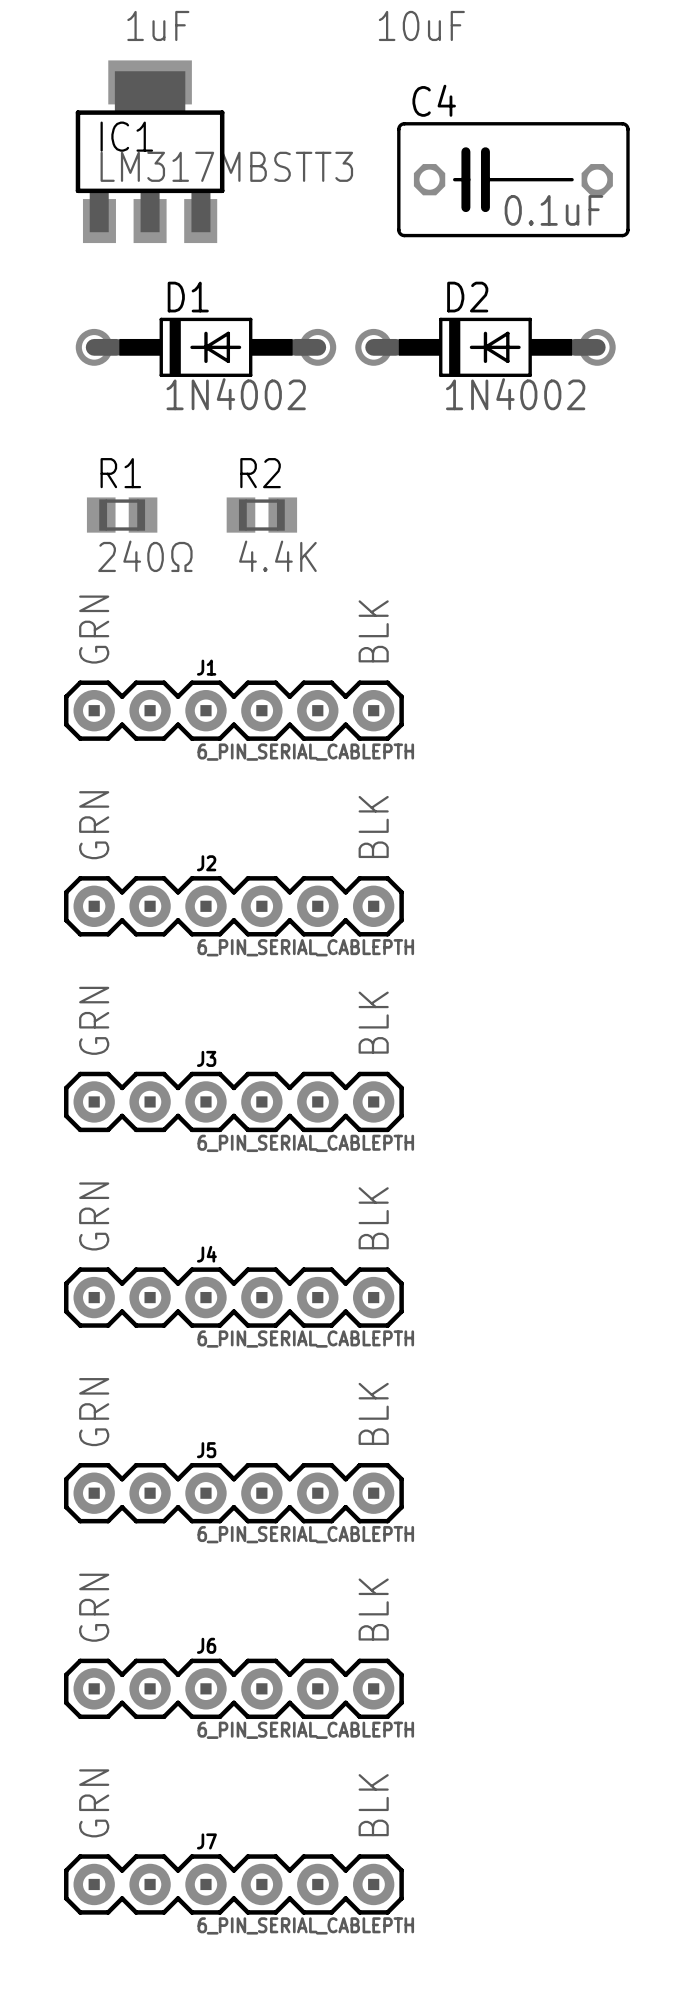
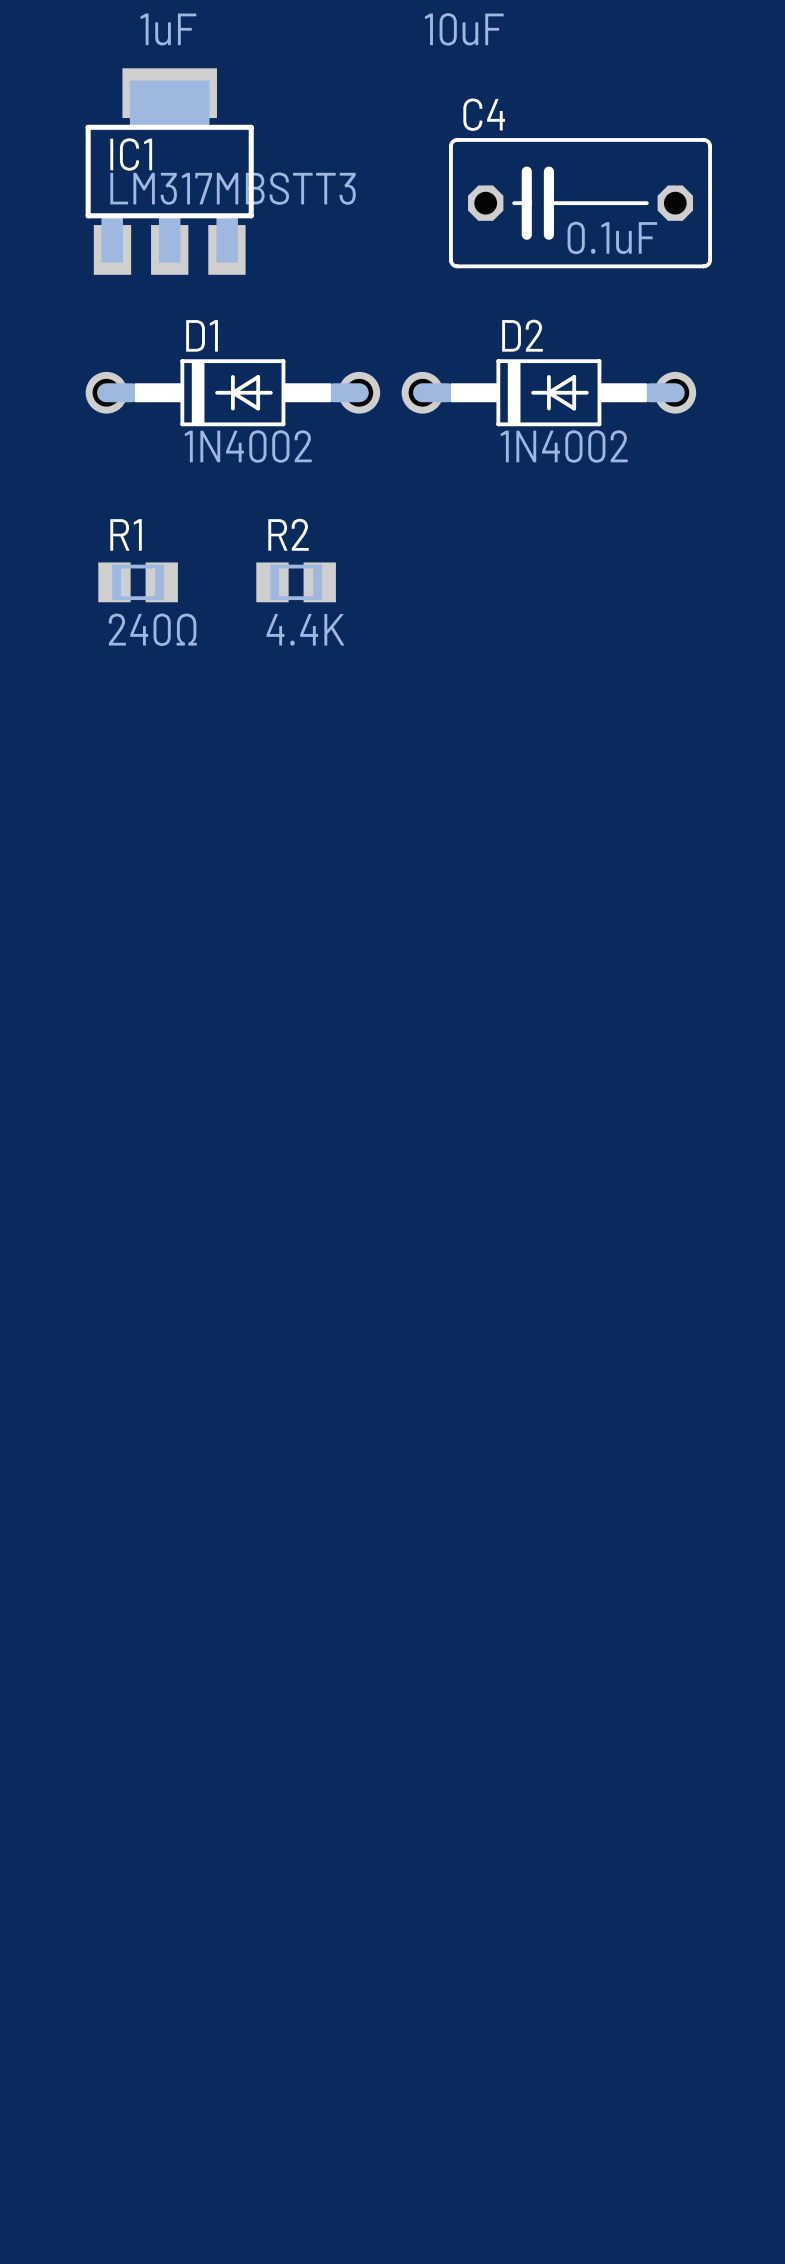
J1: 6_PIN_SERIAL_CABLEPTH (233, 710) -> none
J2: 6_PIN_SERIAL_CABLEPTH (233, 906) -> none
J3: 6_PIN_SERIAL_CABLEPTH (233, 1101) -> none
J4: 6_PIN_SERIAL_CABLEPTH (233, 1297) -> none
J5: 6_PIN_SERIAL_CABLEPTH (233, 1493) -> none
J6: 6_PIN_SERIAL_CABLEPTH (233, 1688) -> none
J7: 6_PIN_SERIAL_CABLEPTH (233, 1884) -> none

